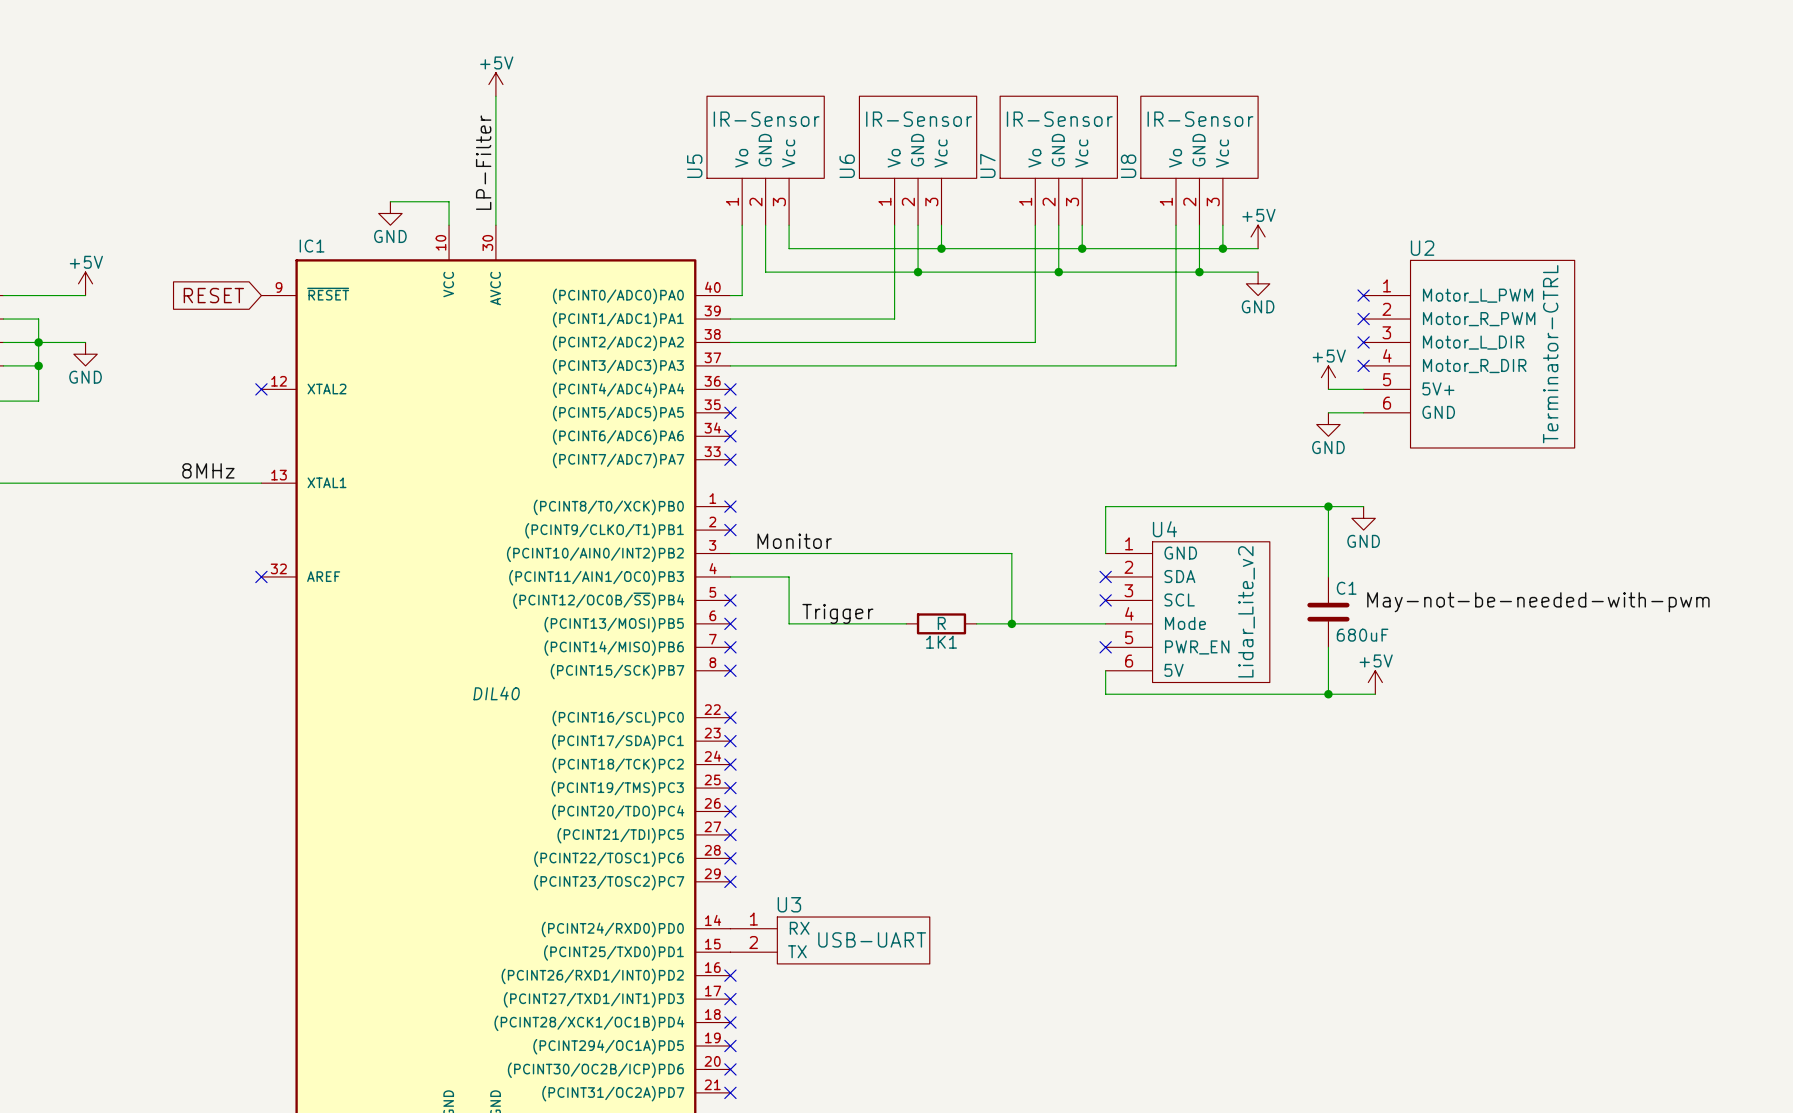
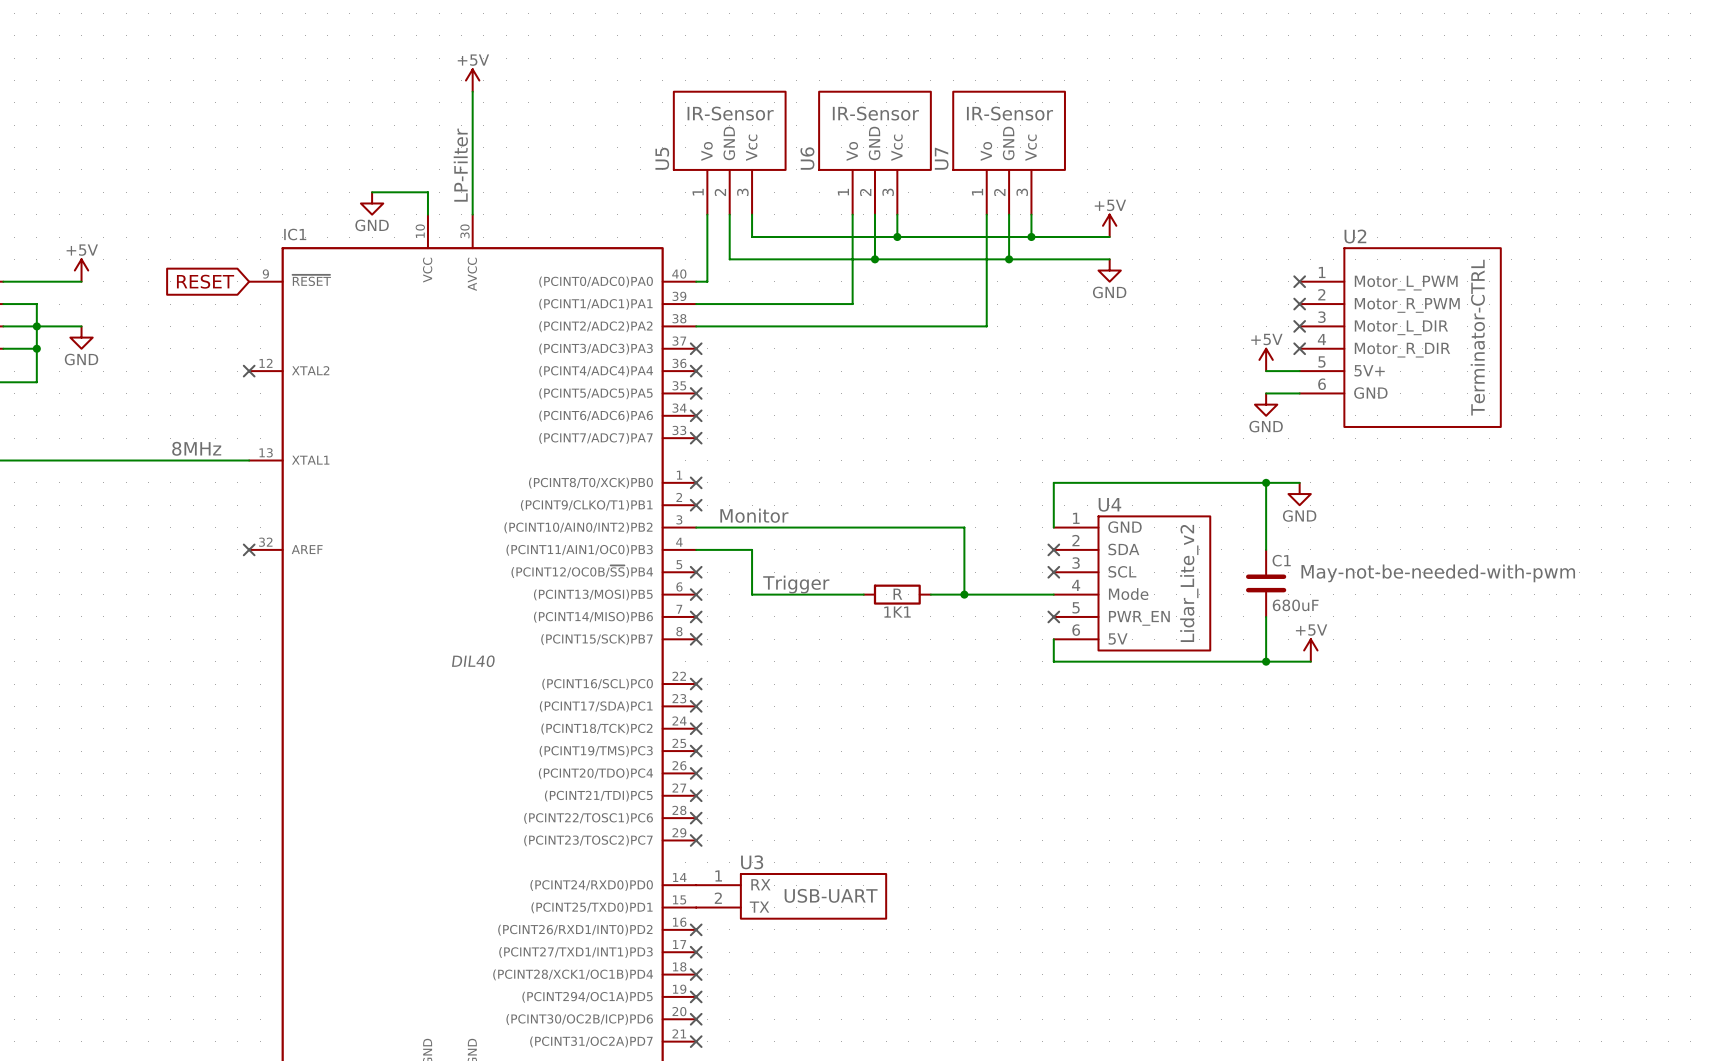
U8: IR-Sensor (1199, 160) -> none
wire: (1176, 225) (1176, 365) (730, 365) -> none
wire: (1199, 225) (1199, 272) -> none
wire: (1222, 225) (1222, 248) -> none
power symbol position: +5V (1258, 236) -> +5V (1109, 225)
wire: (1164, 248) (1258, 248) -> none
junction: (1222, 248) -> none
wire: (1164, 272) (1258, 272) -> none
junction: (1199, 272) -> none
power symbol position: GND (1258, 283) -> GND (1109, 270)
no-connect mark: none -> (696, 348)

